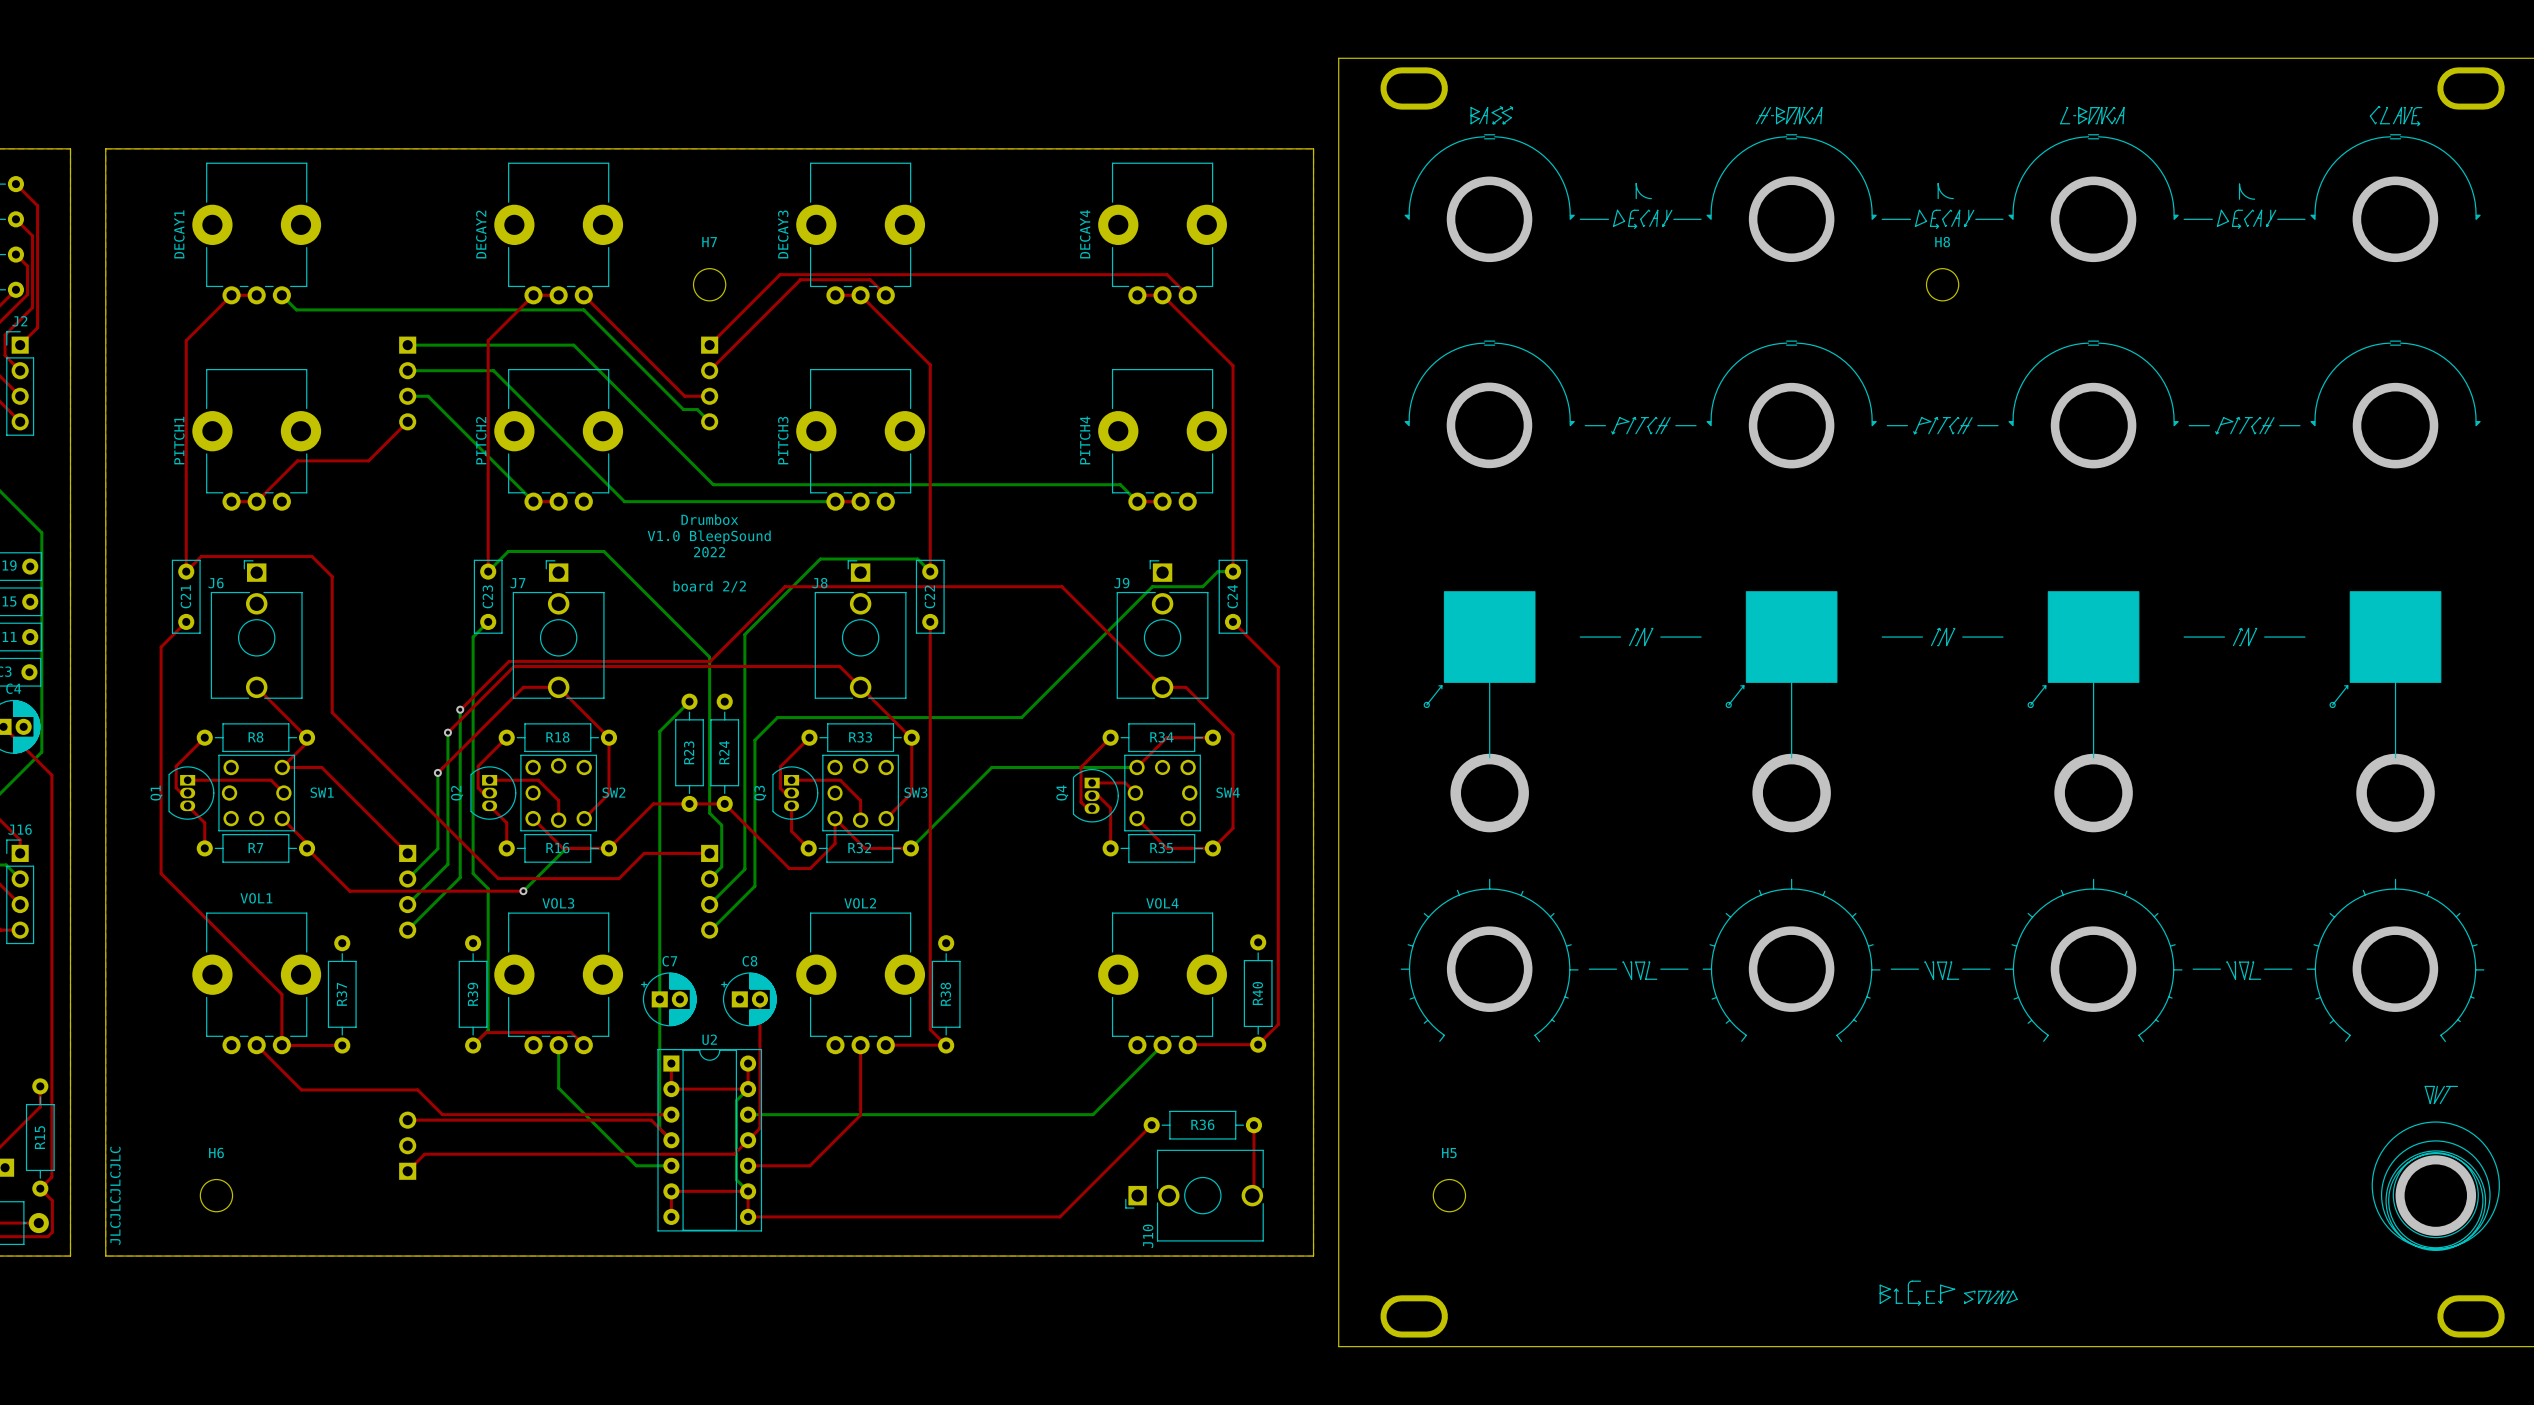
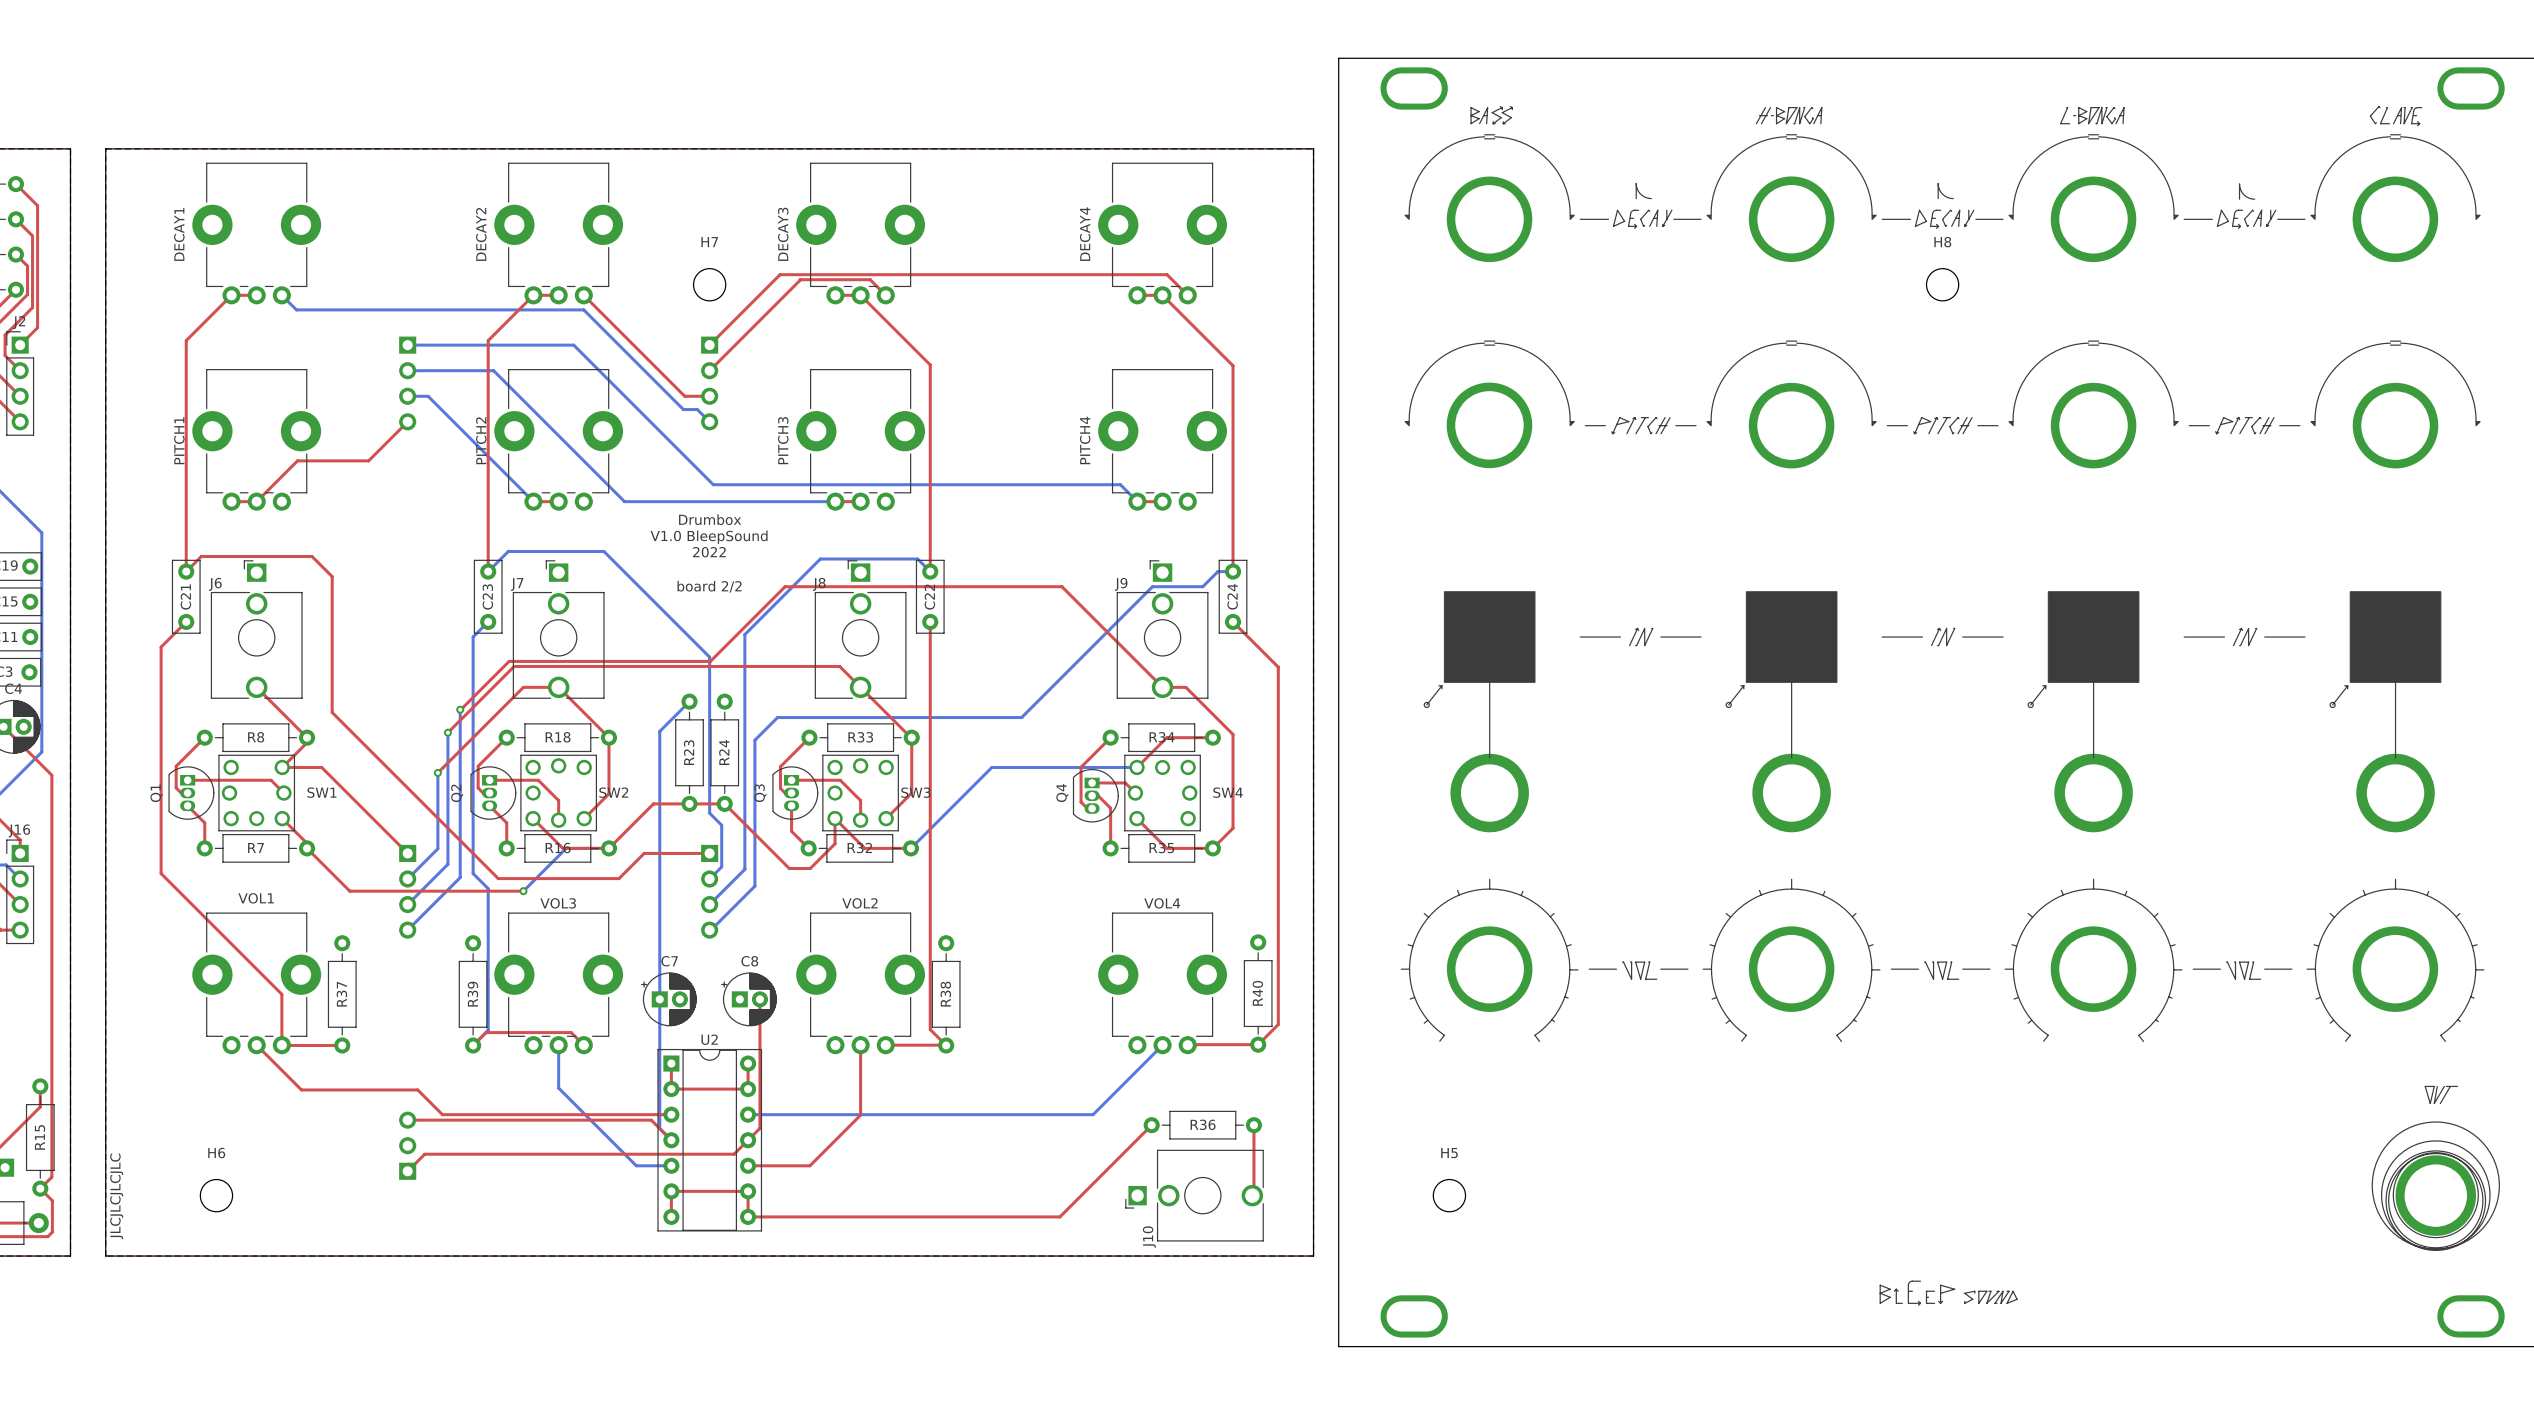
bottom track: (748, 1089) (736, 1100) (736, 1179) (748, 1191) -> none

